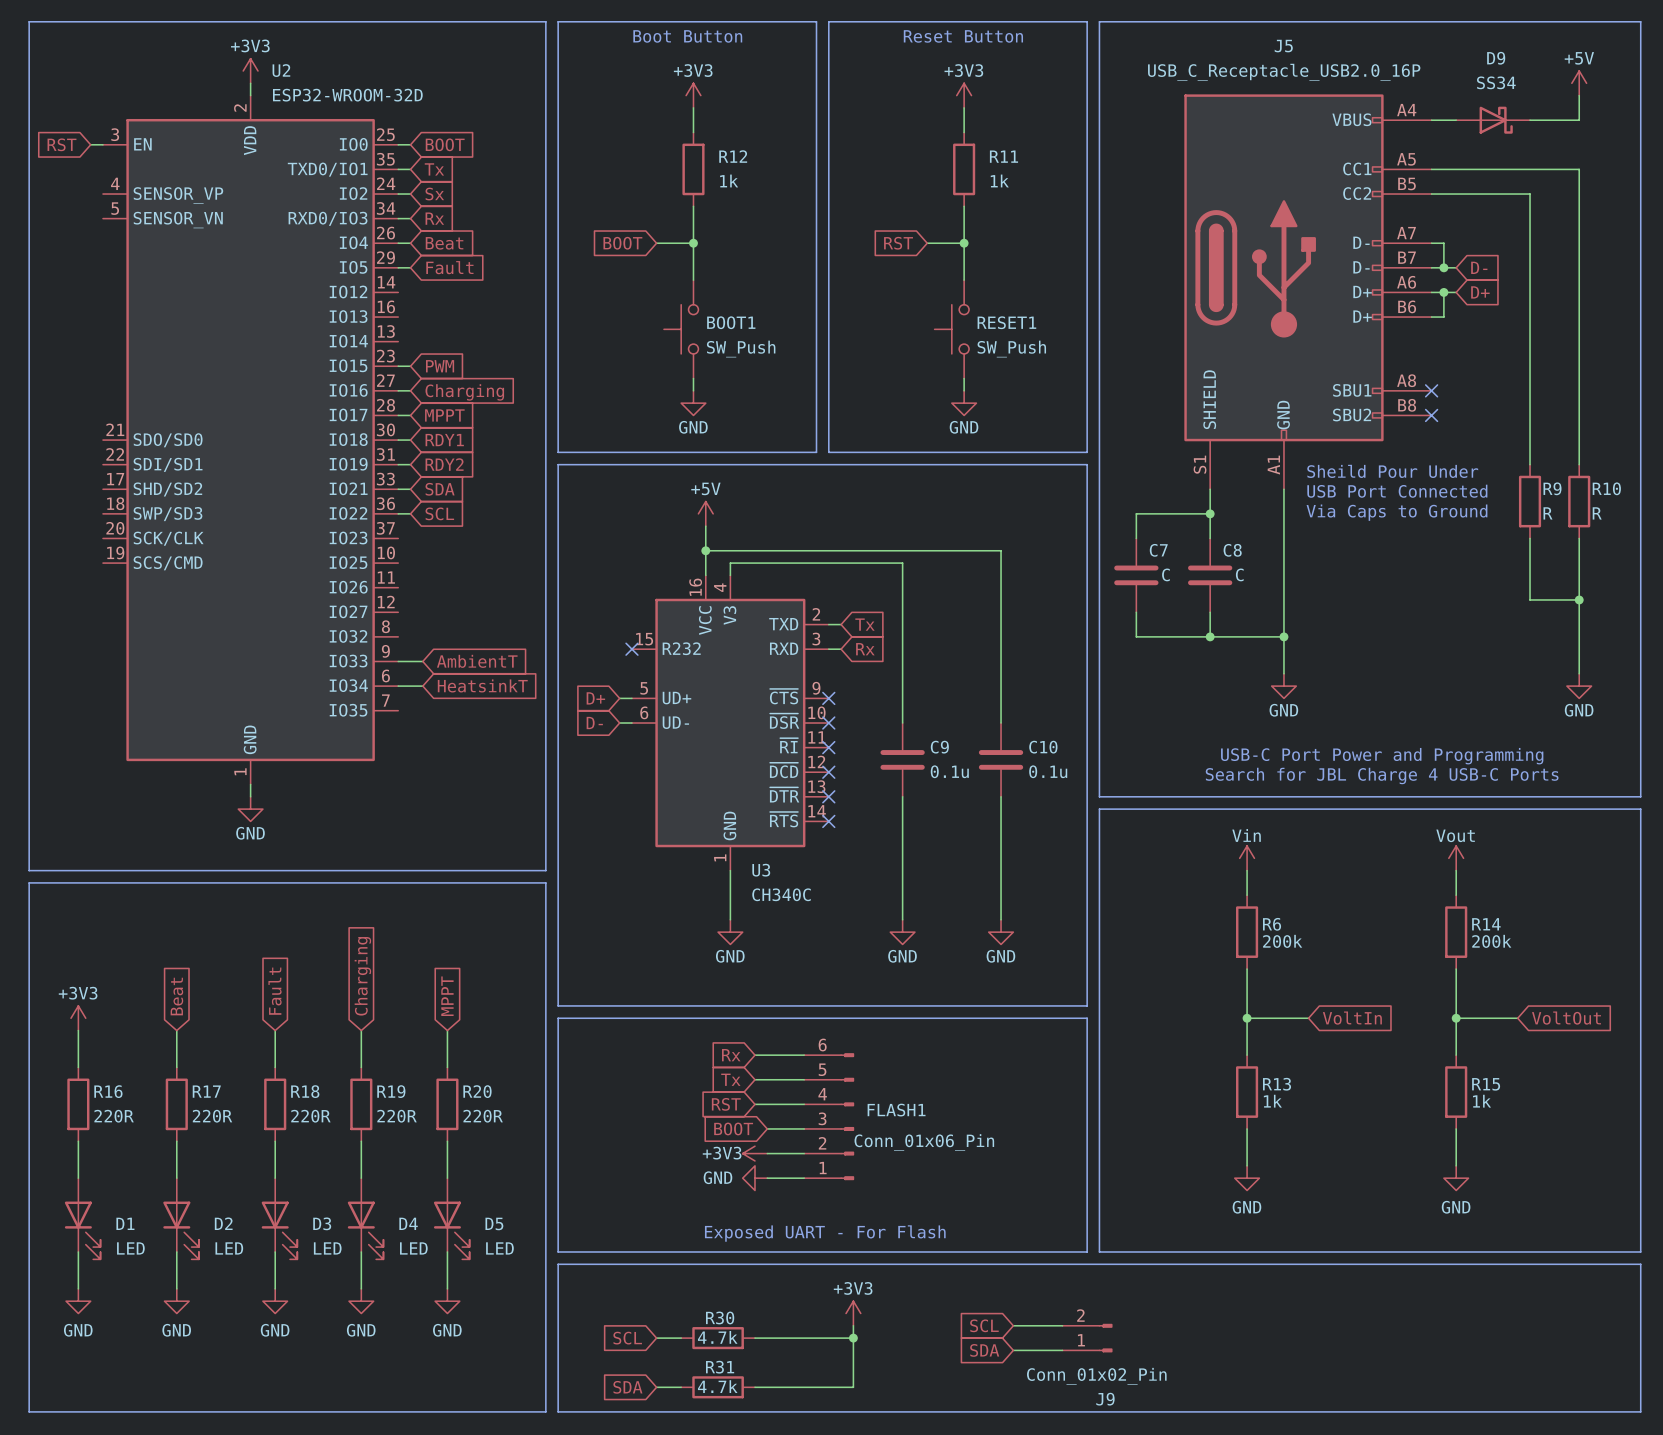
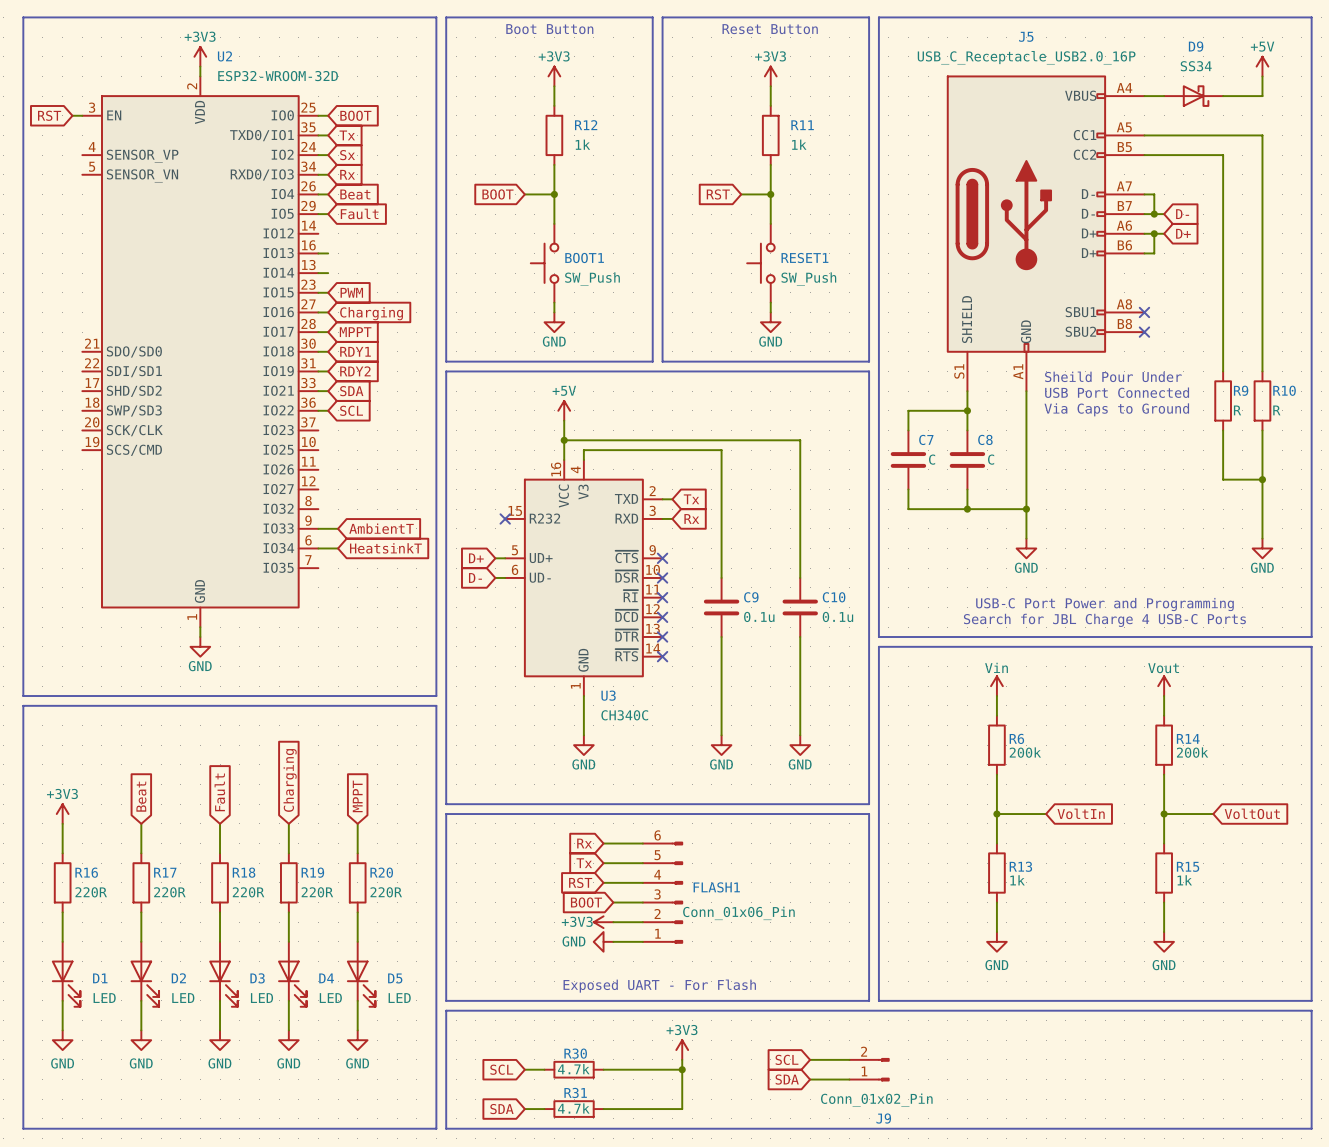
wire: none -> (318, 253) (328, 253)
wire: none -> (318, 273) (328, 273)

